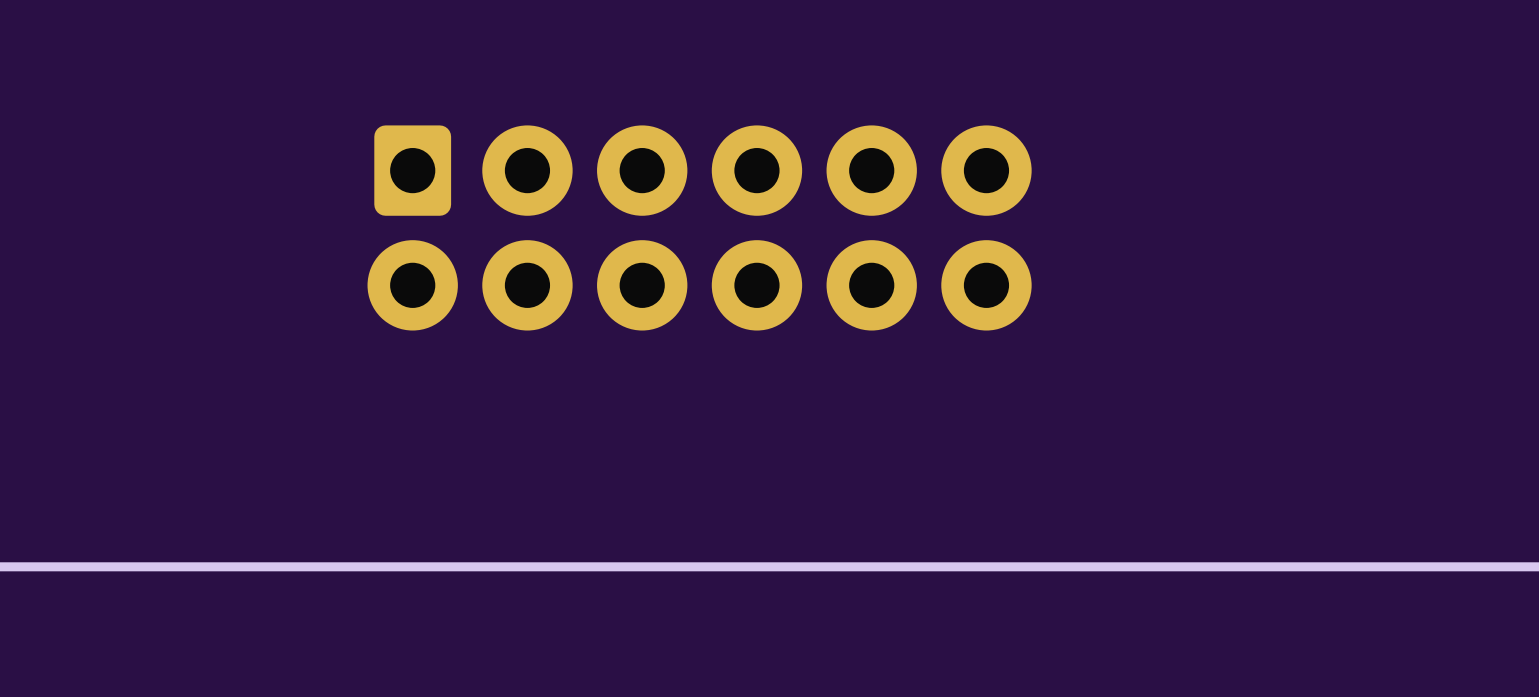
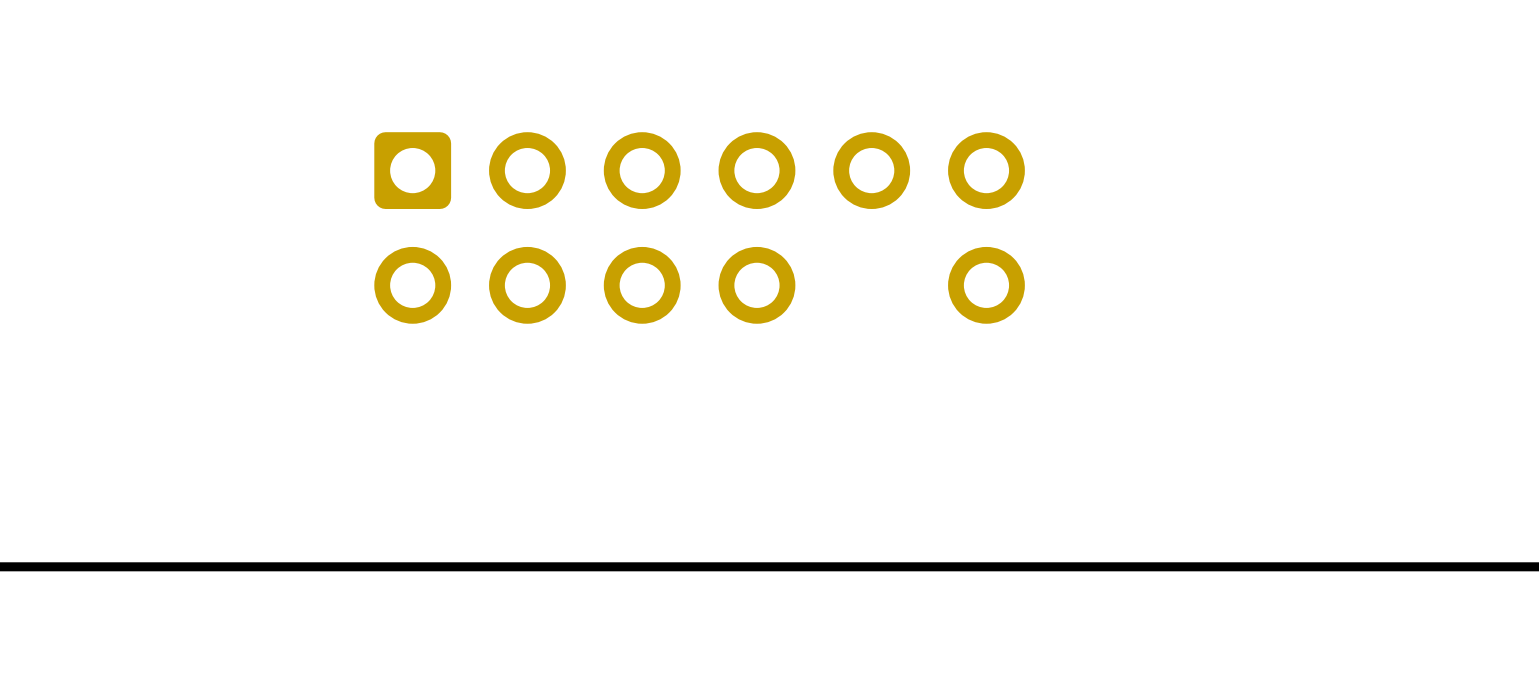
part footprint: [367, 125, 1032, 331] -> [374, 132, 1025, 324]

